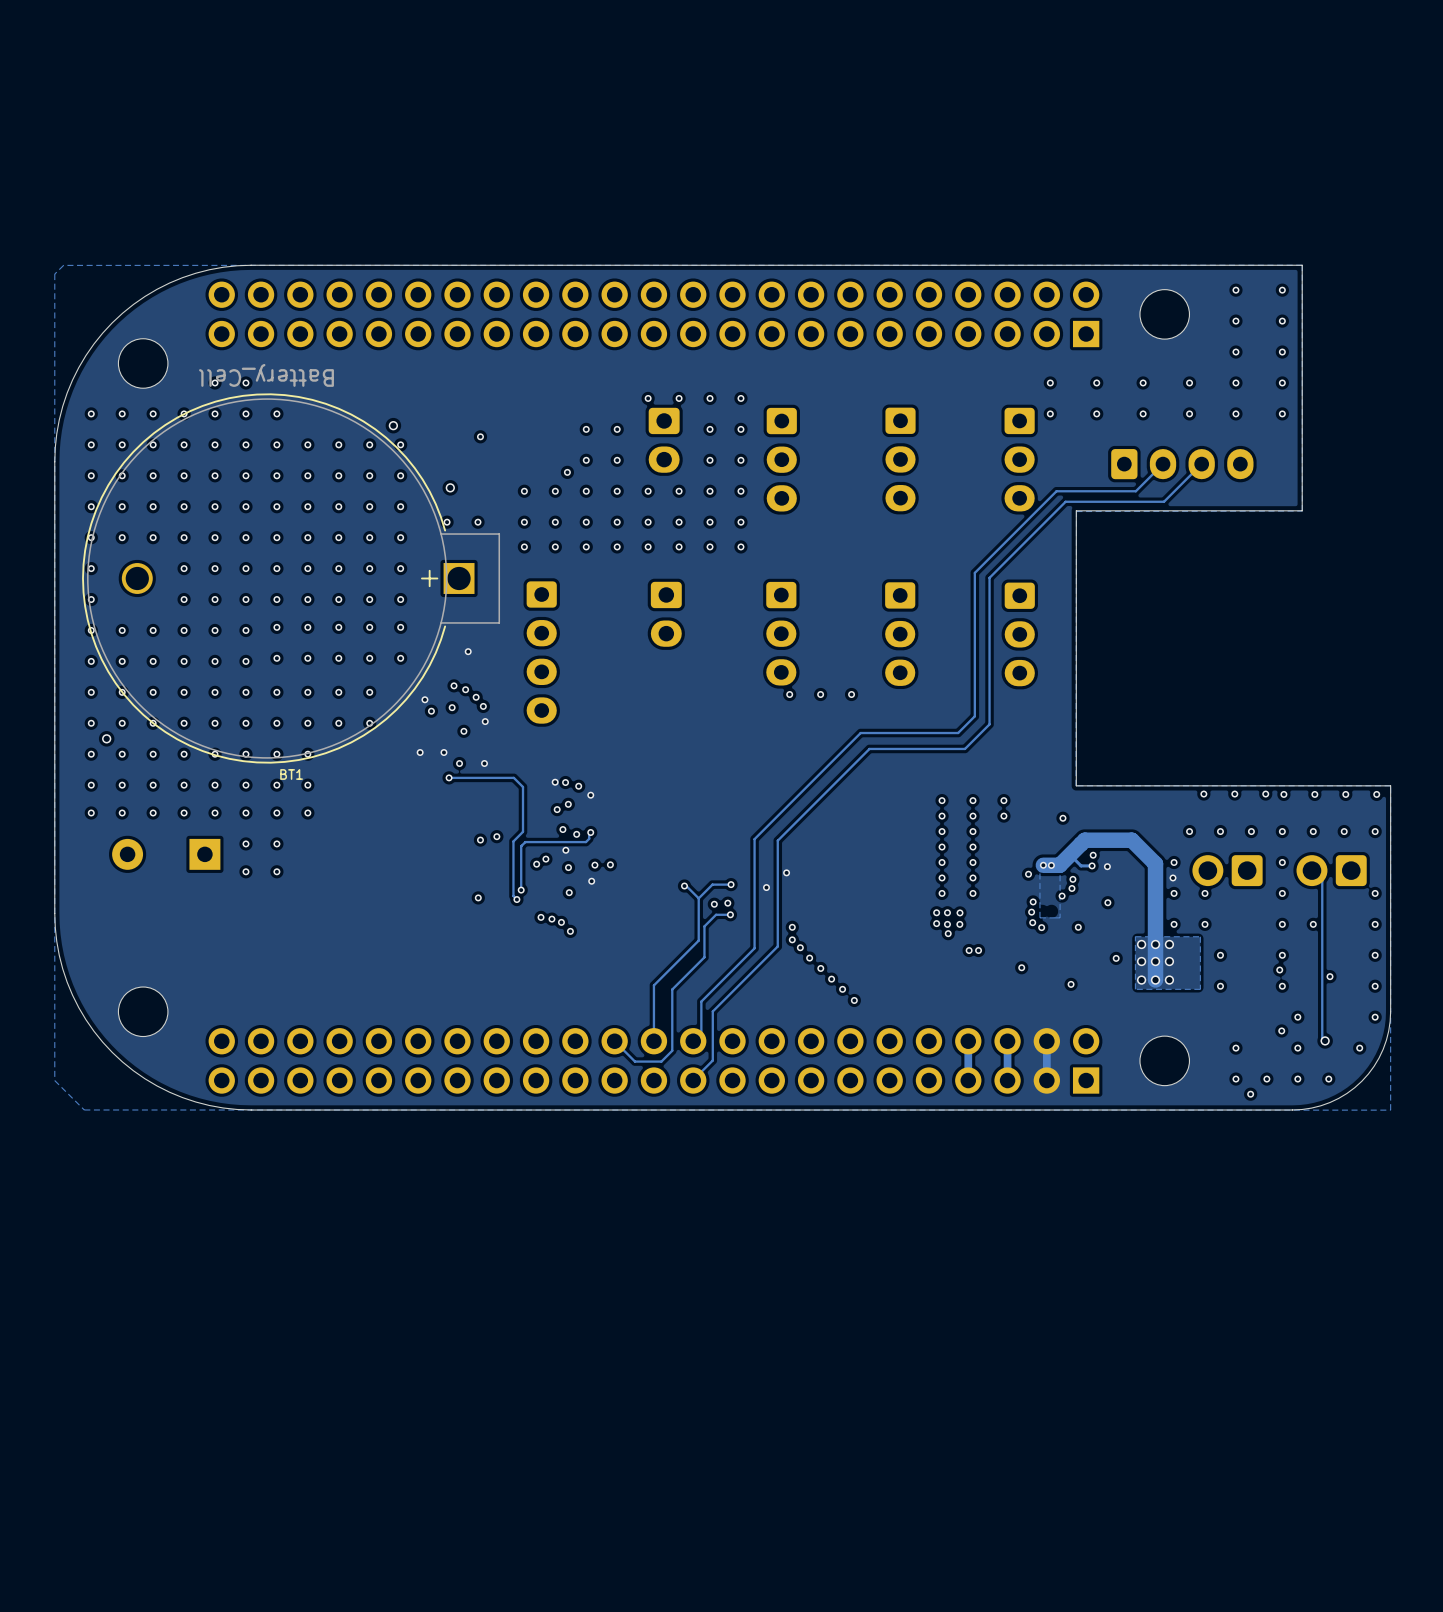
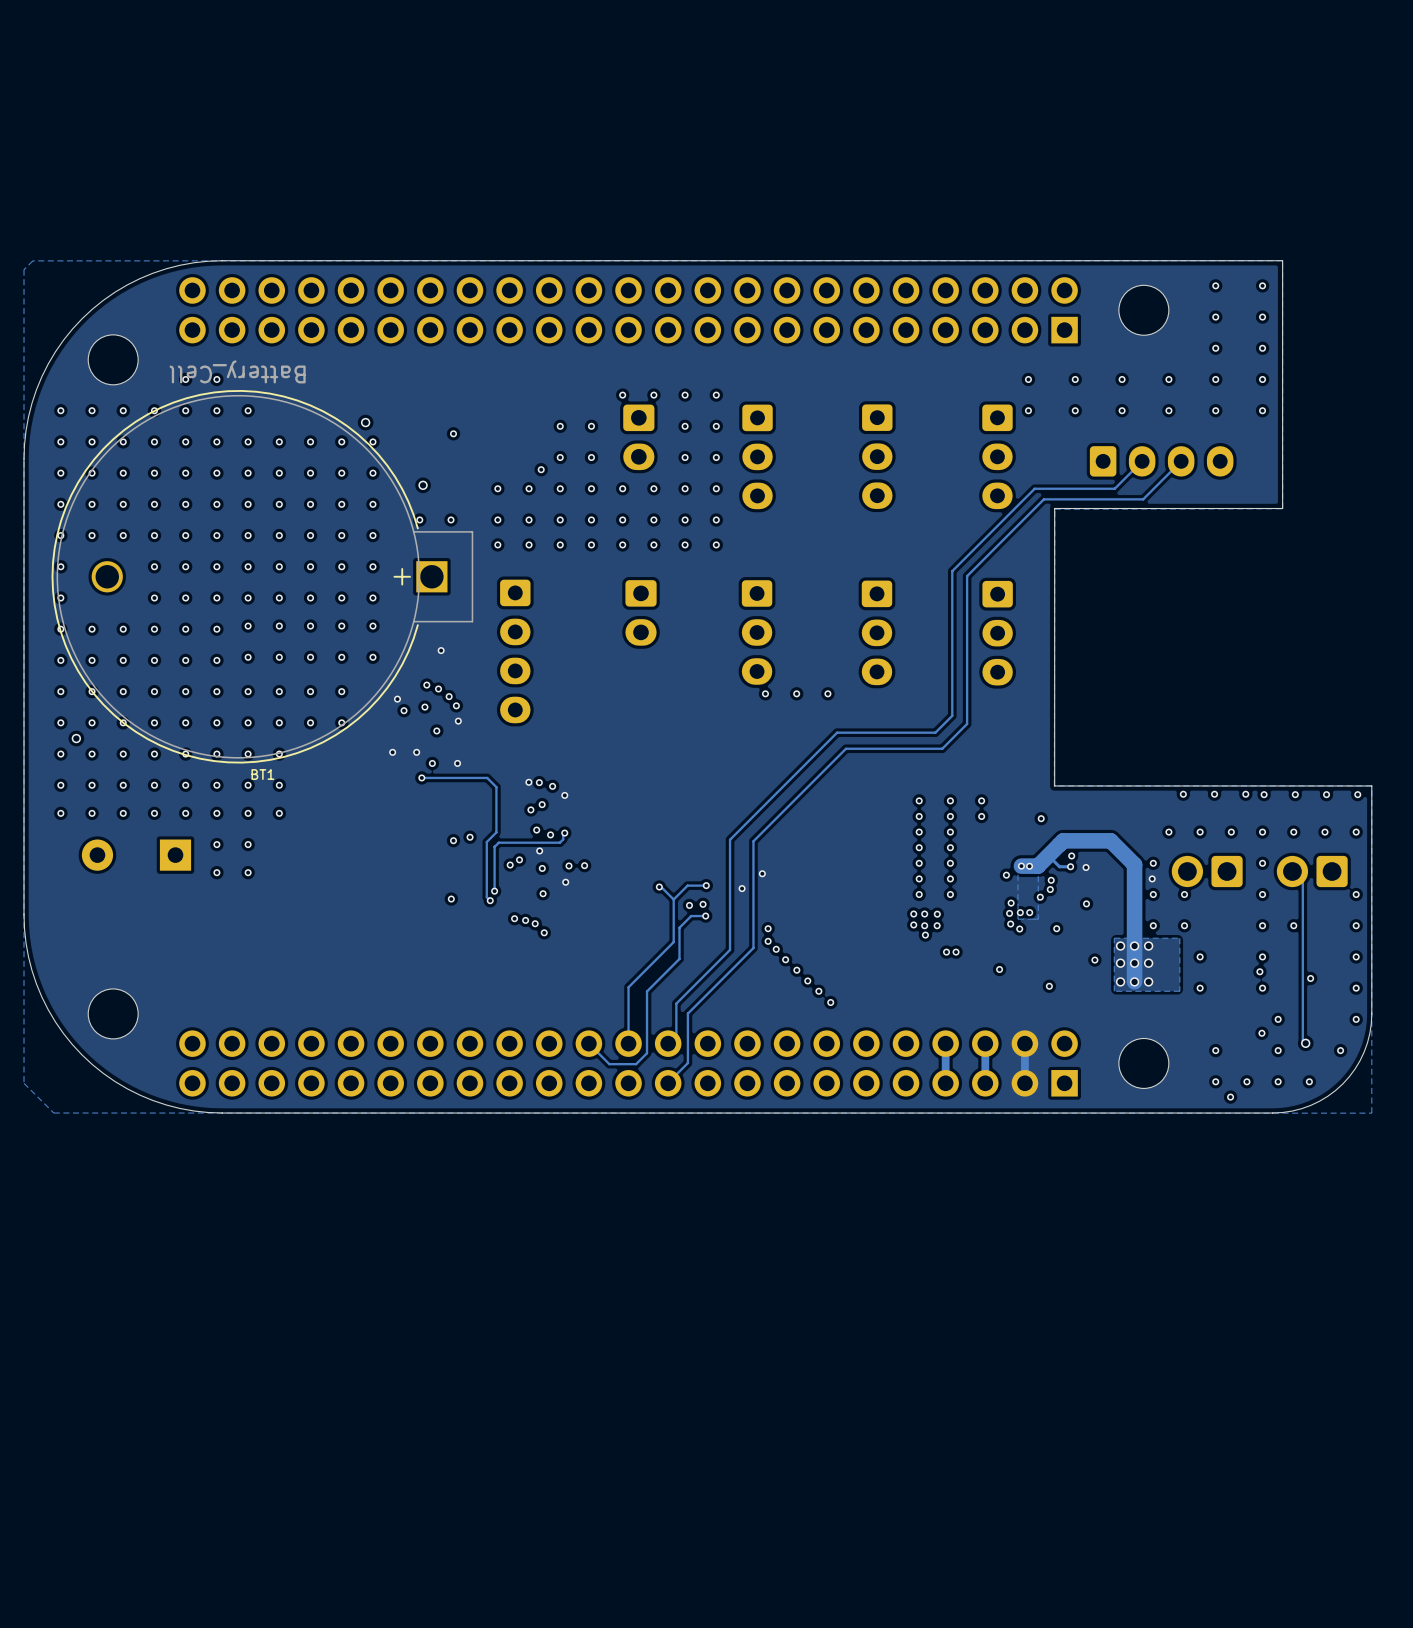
via: none -> (1020, 912)
via: none -> (1029, 912)

